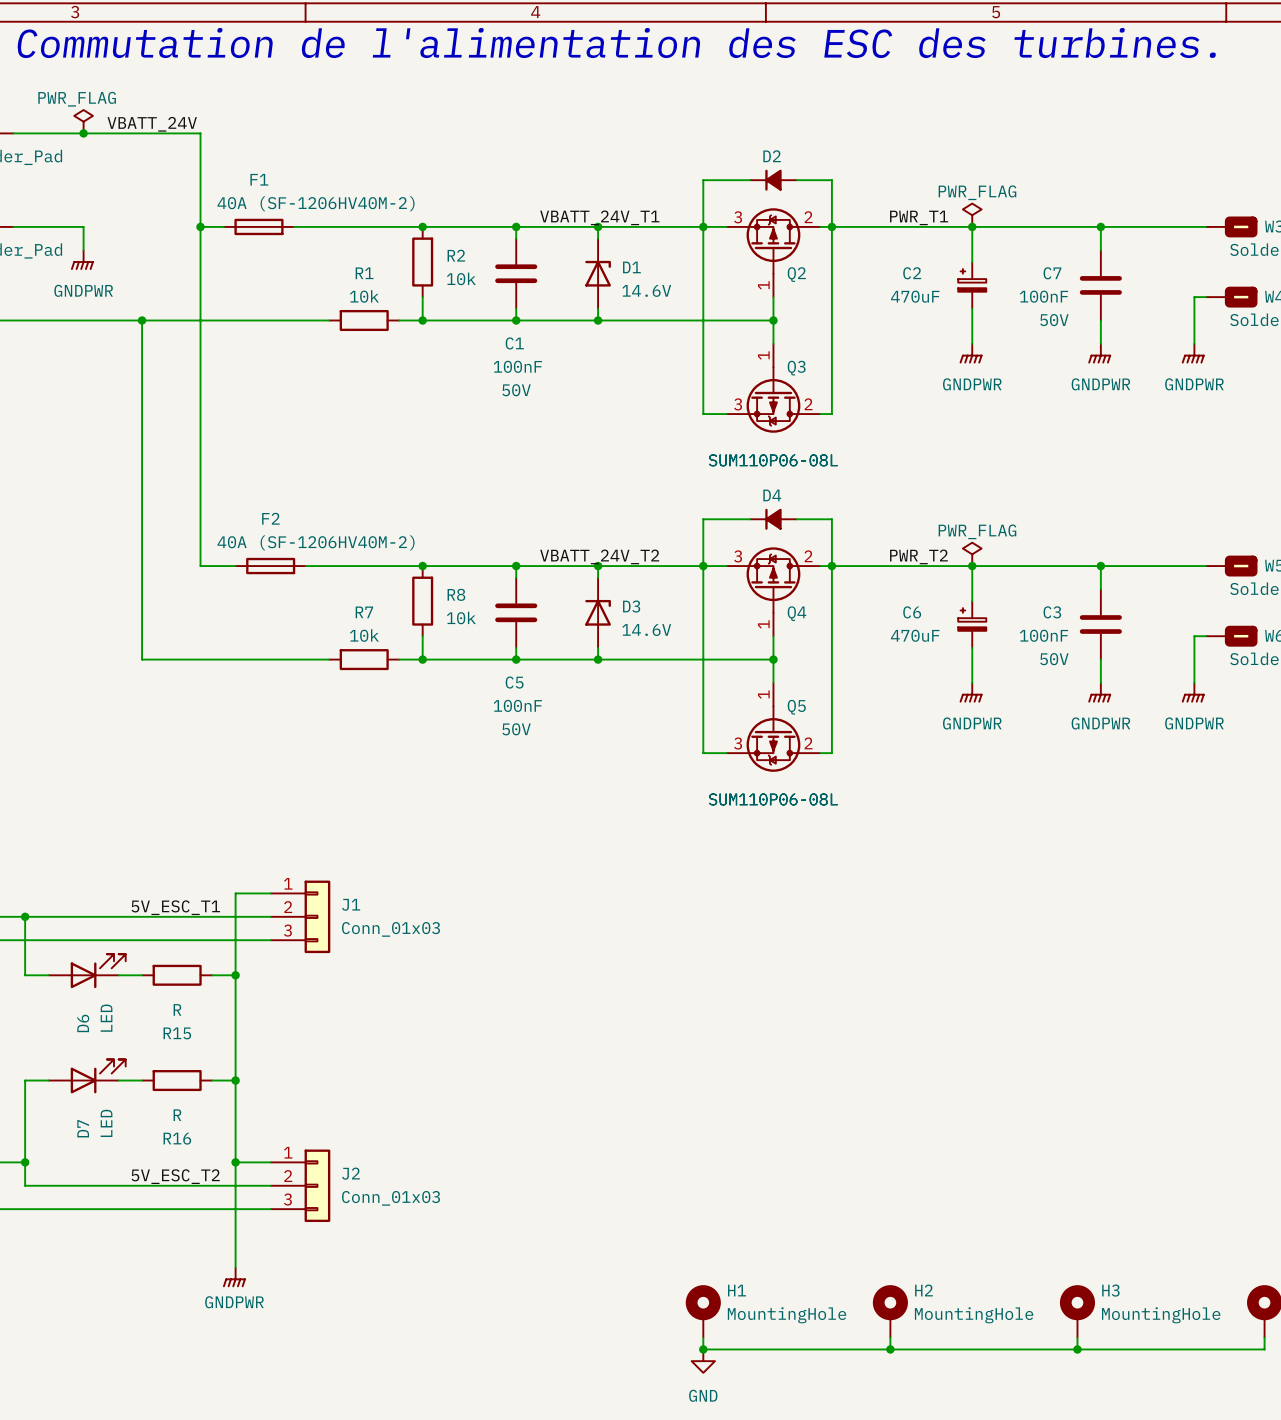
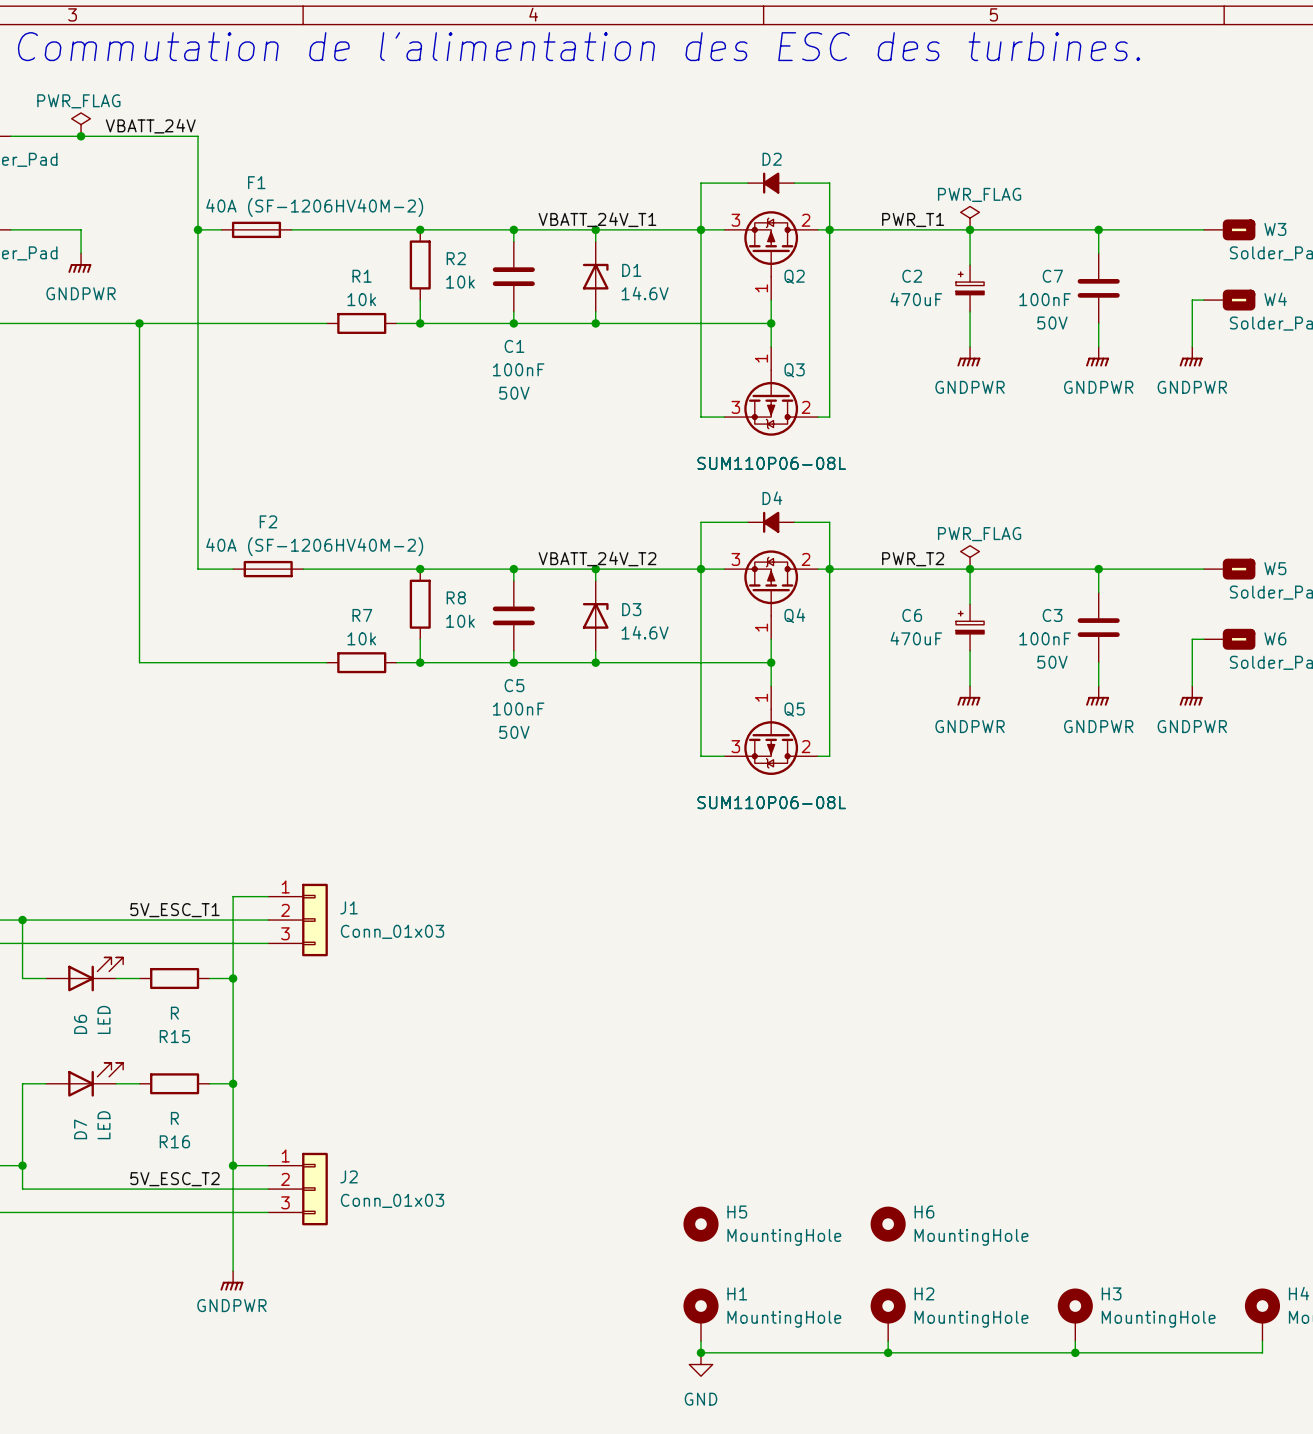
H5: none -> MountingHole (700, 1224)
H6: none -> MountingHole (888, 1224)

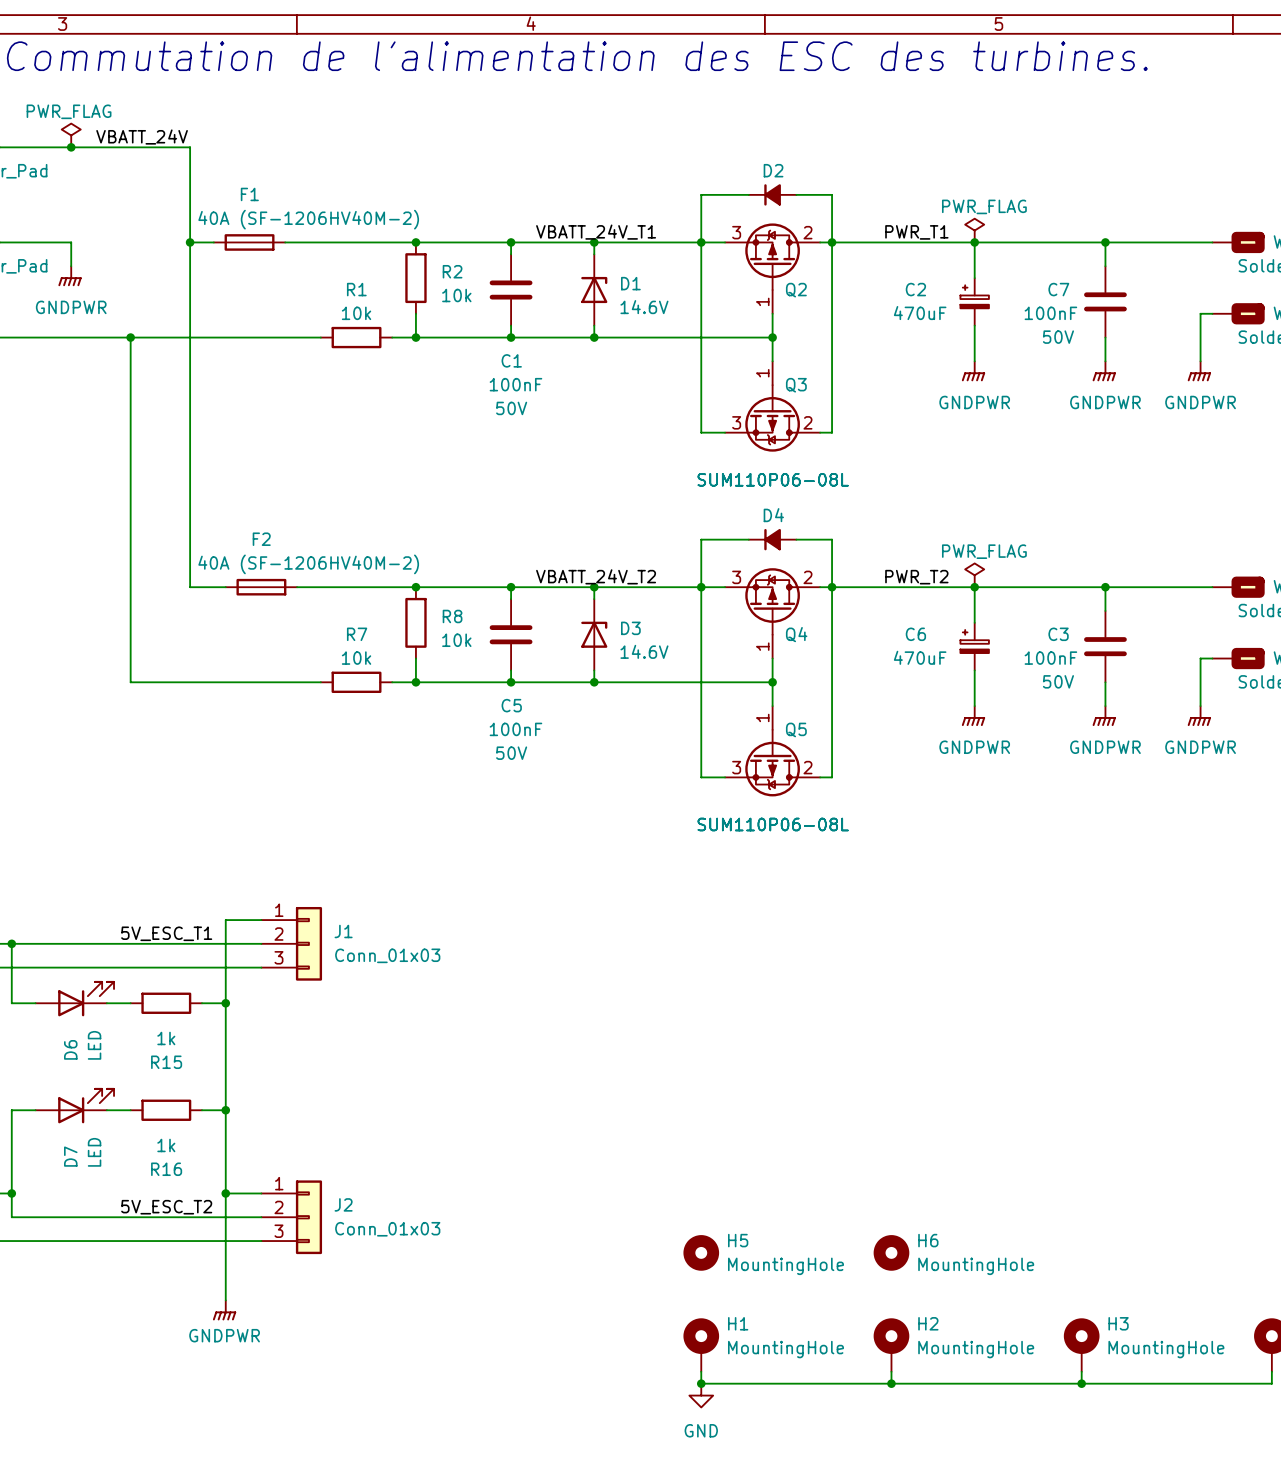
R15 value: R (174, 1013) -> 1k (166, 1038)
R16 value: R (174, 1118) -> 1k (166, 1145)

